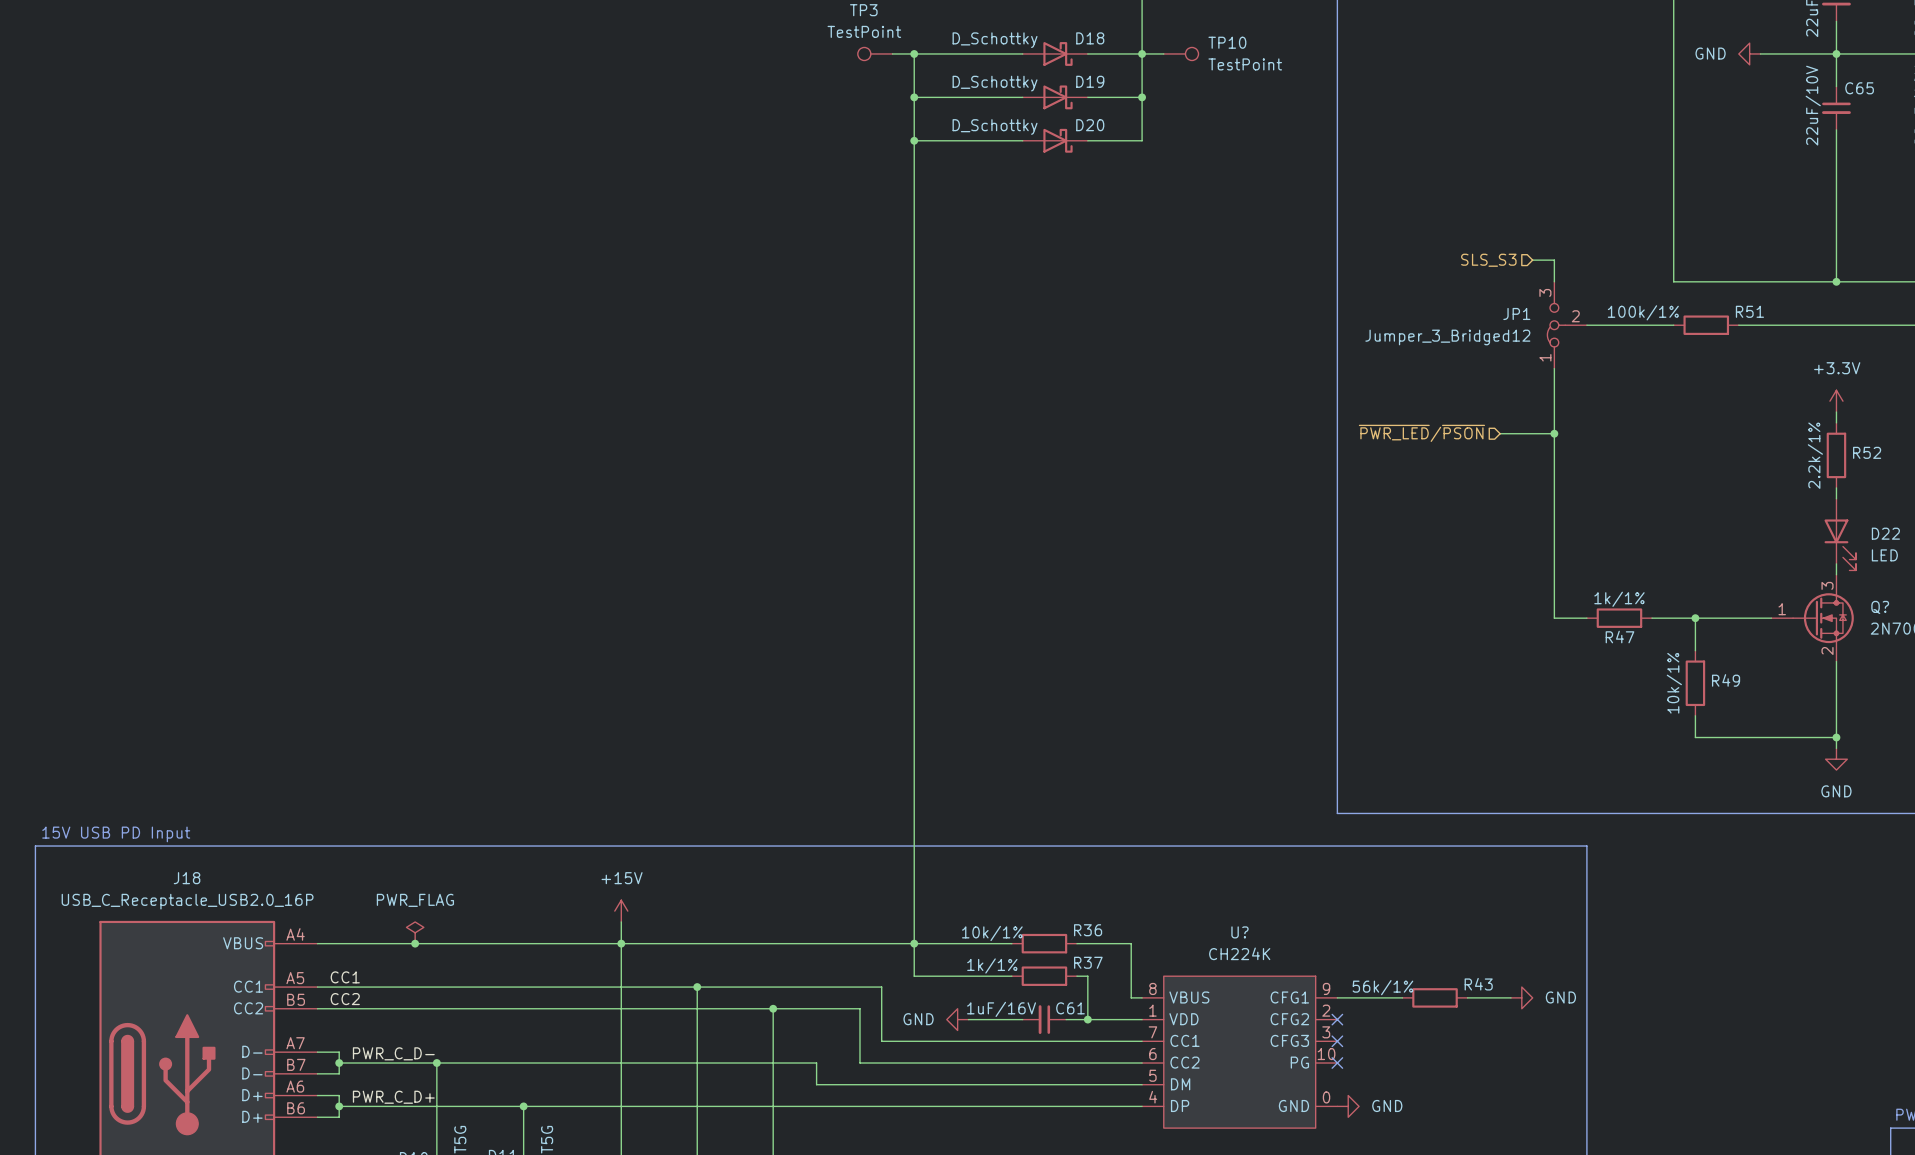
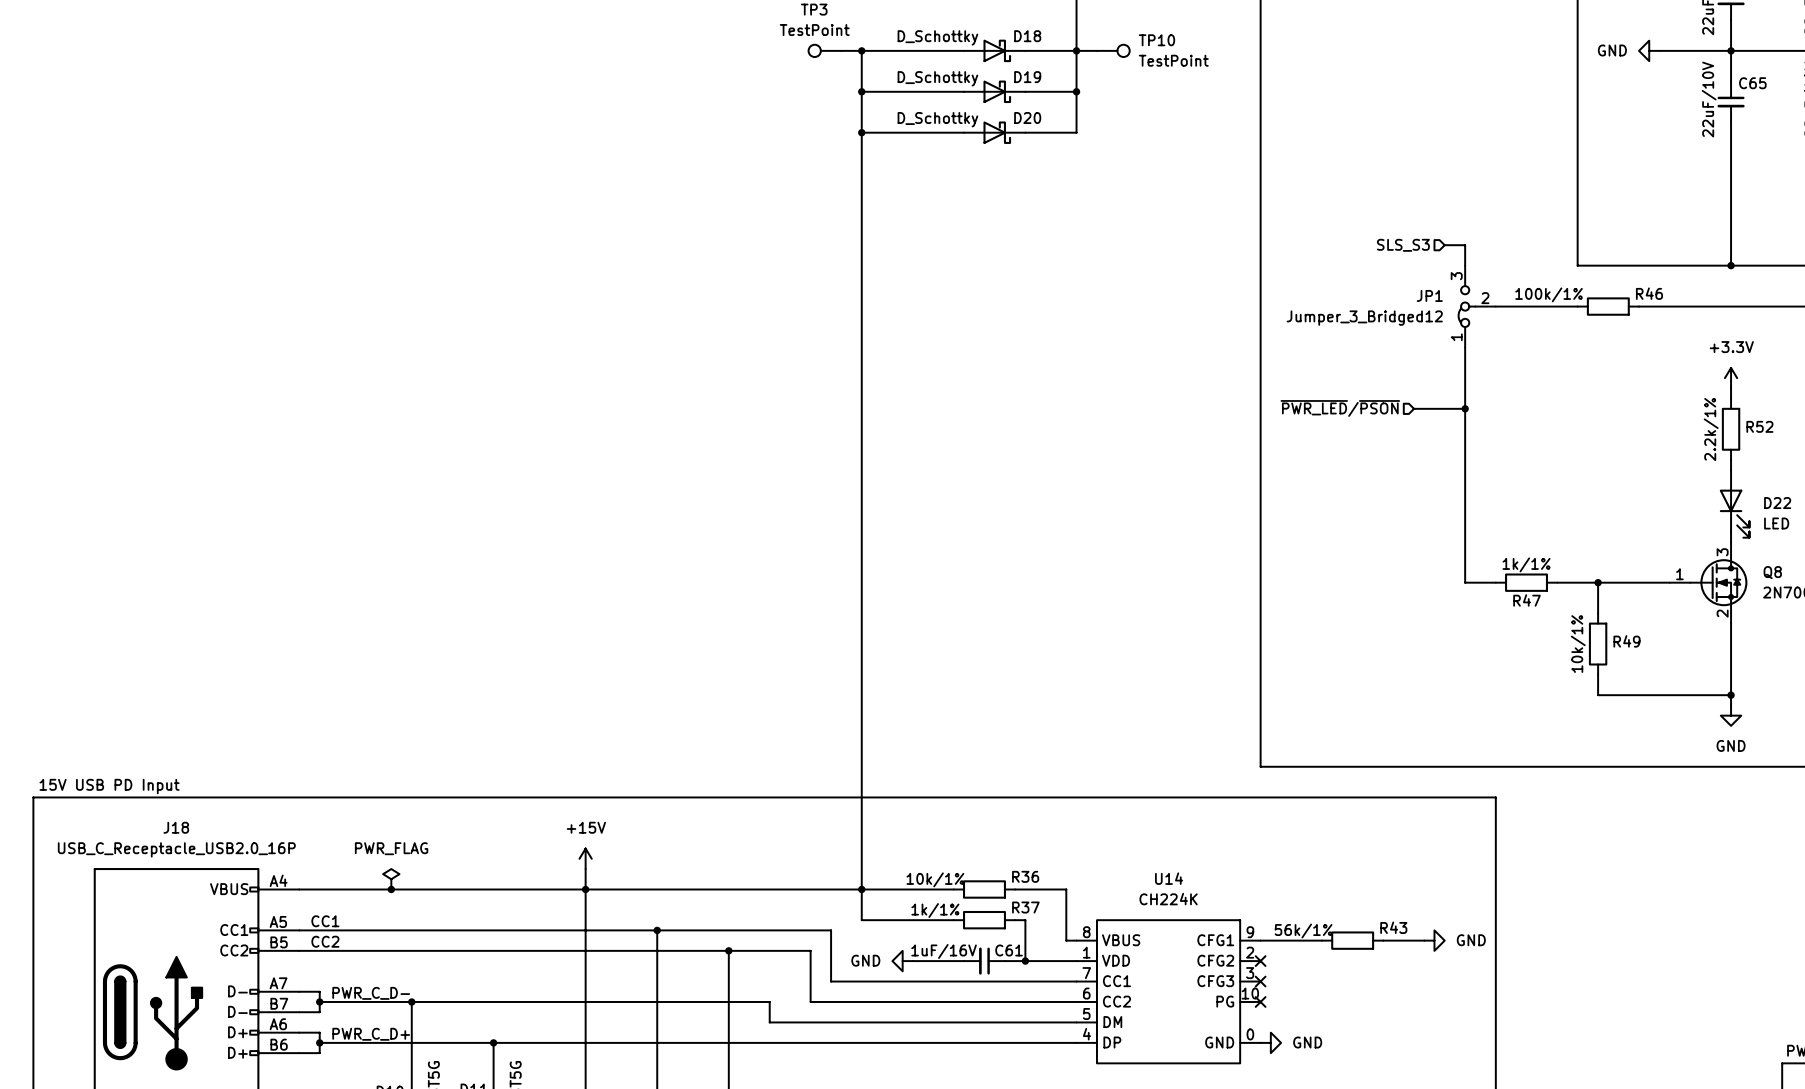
R51 name: R51 (1749, 311) -> R46 (1649, 293)
Q? name: Q? (1880, 607) -> Q8 (1772, 572)
U? name: U? (1239, 932) -> U14 (1169, 878)

